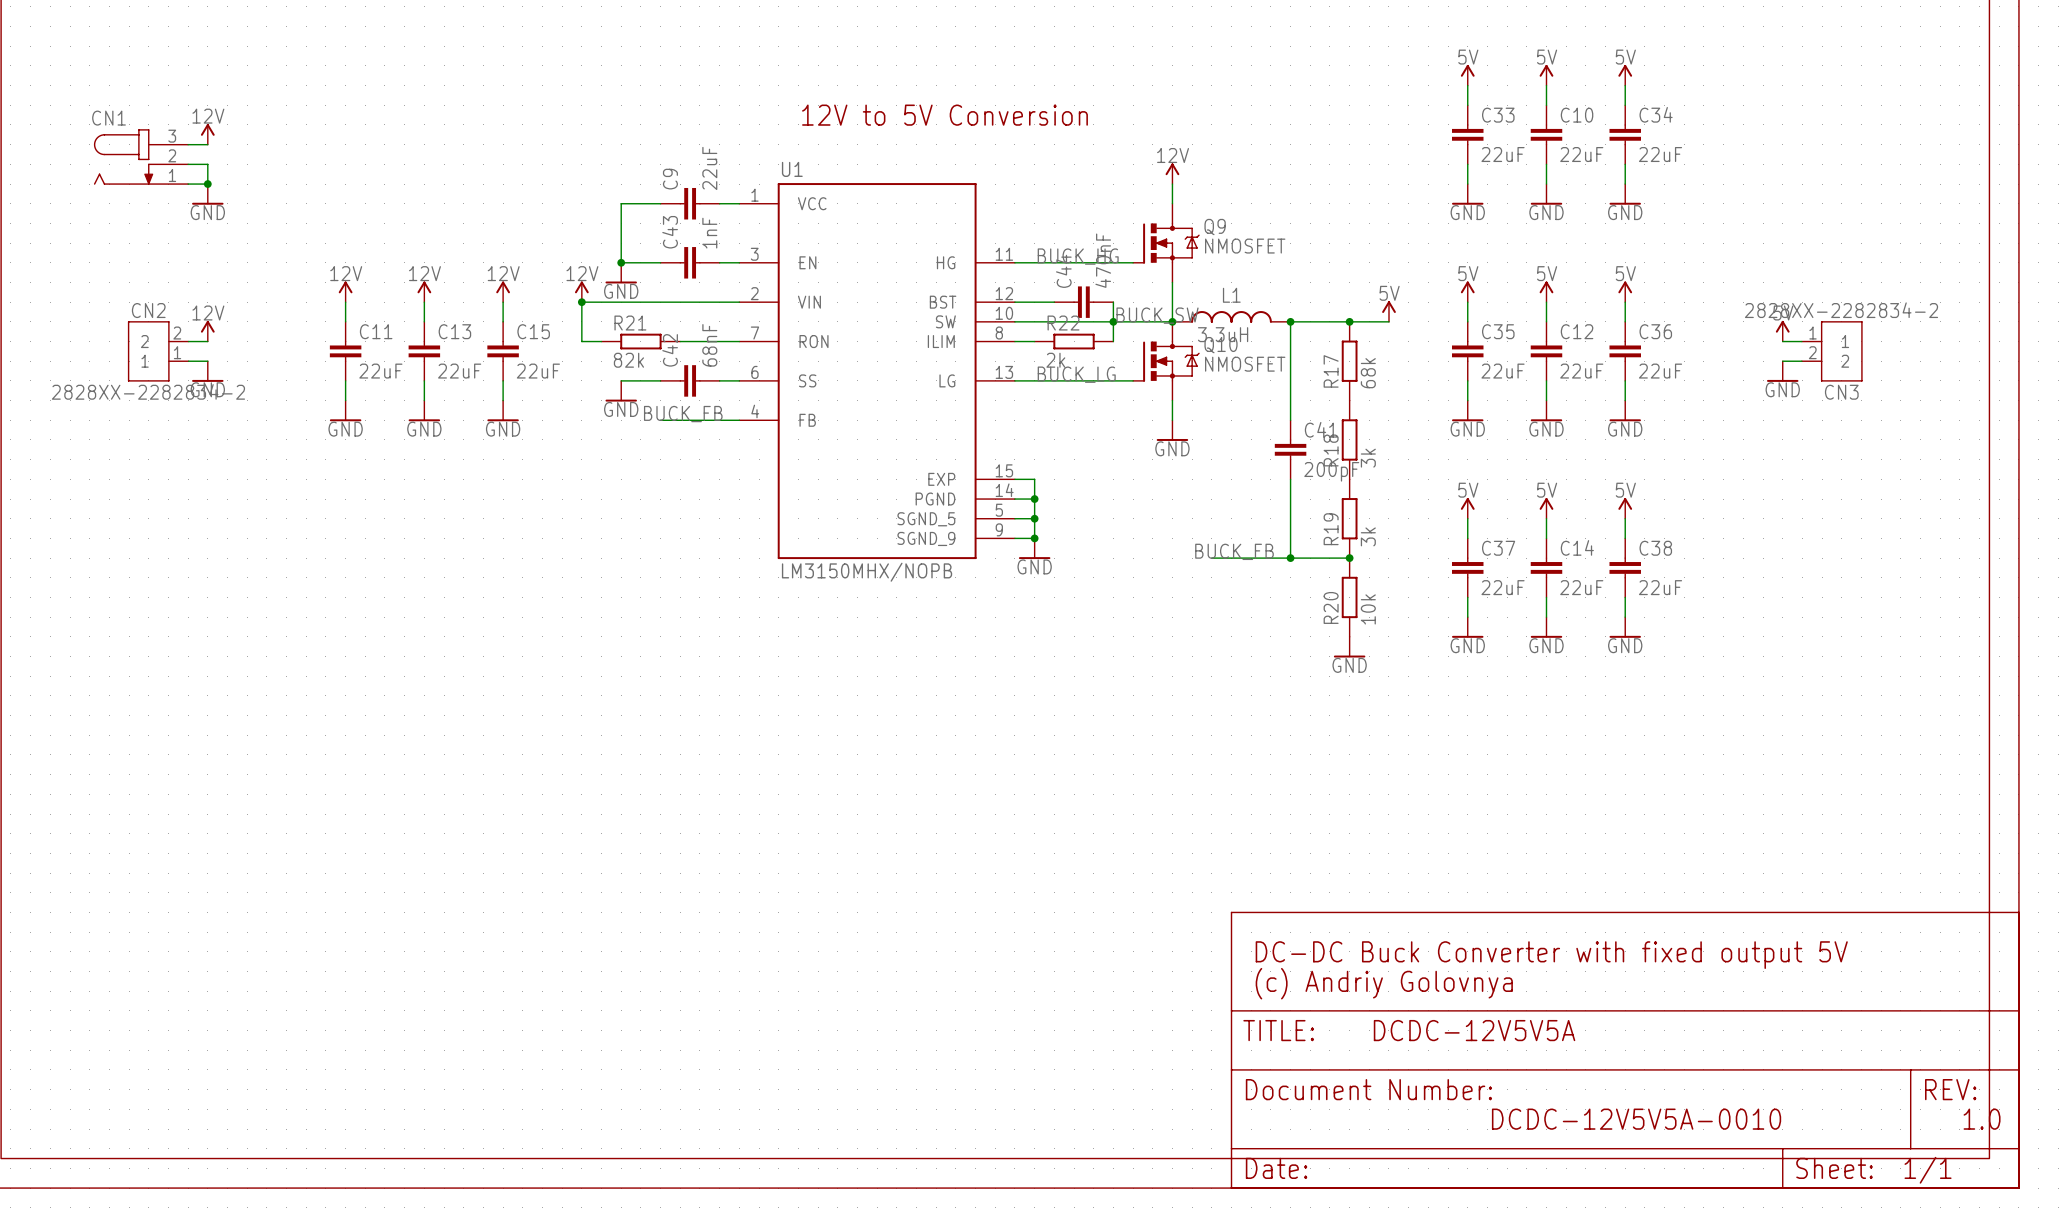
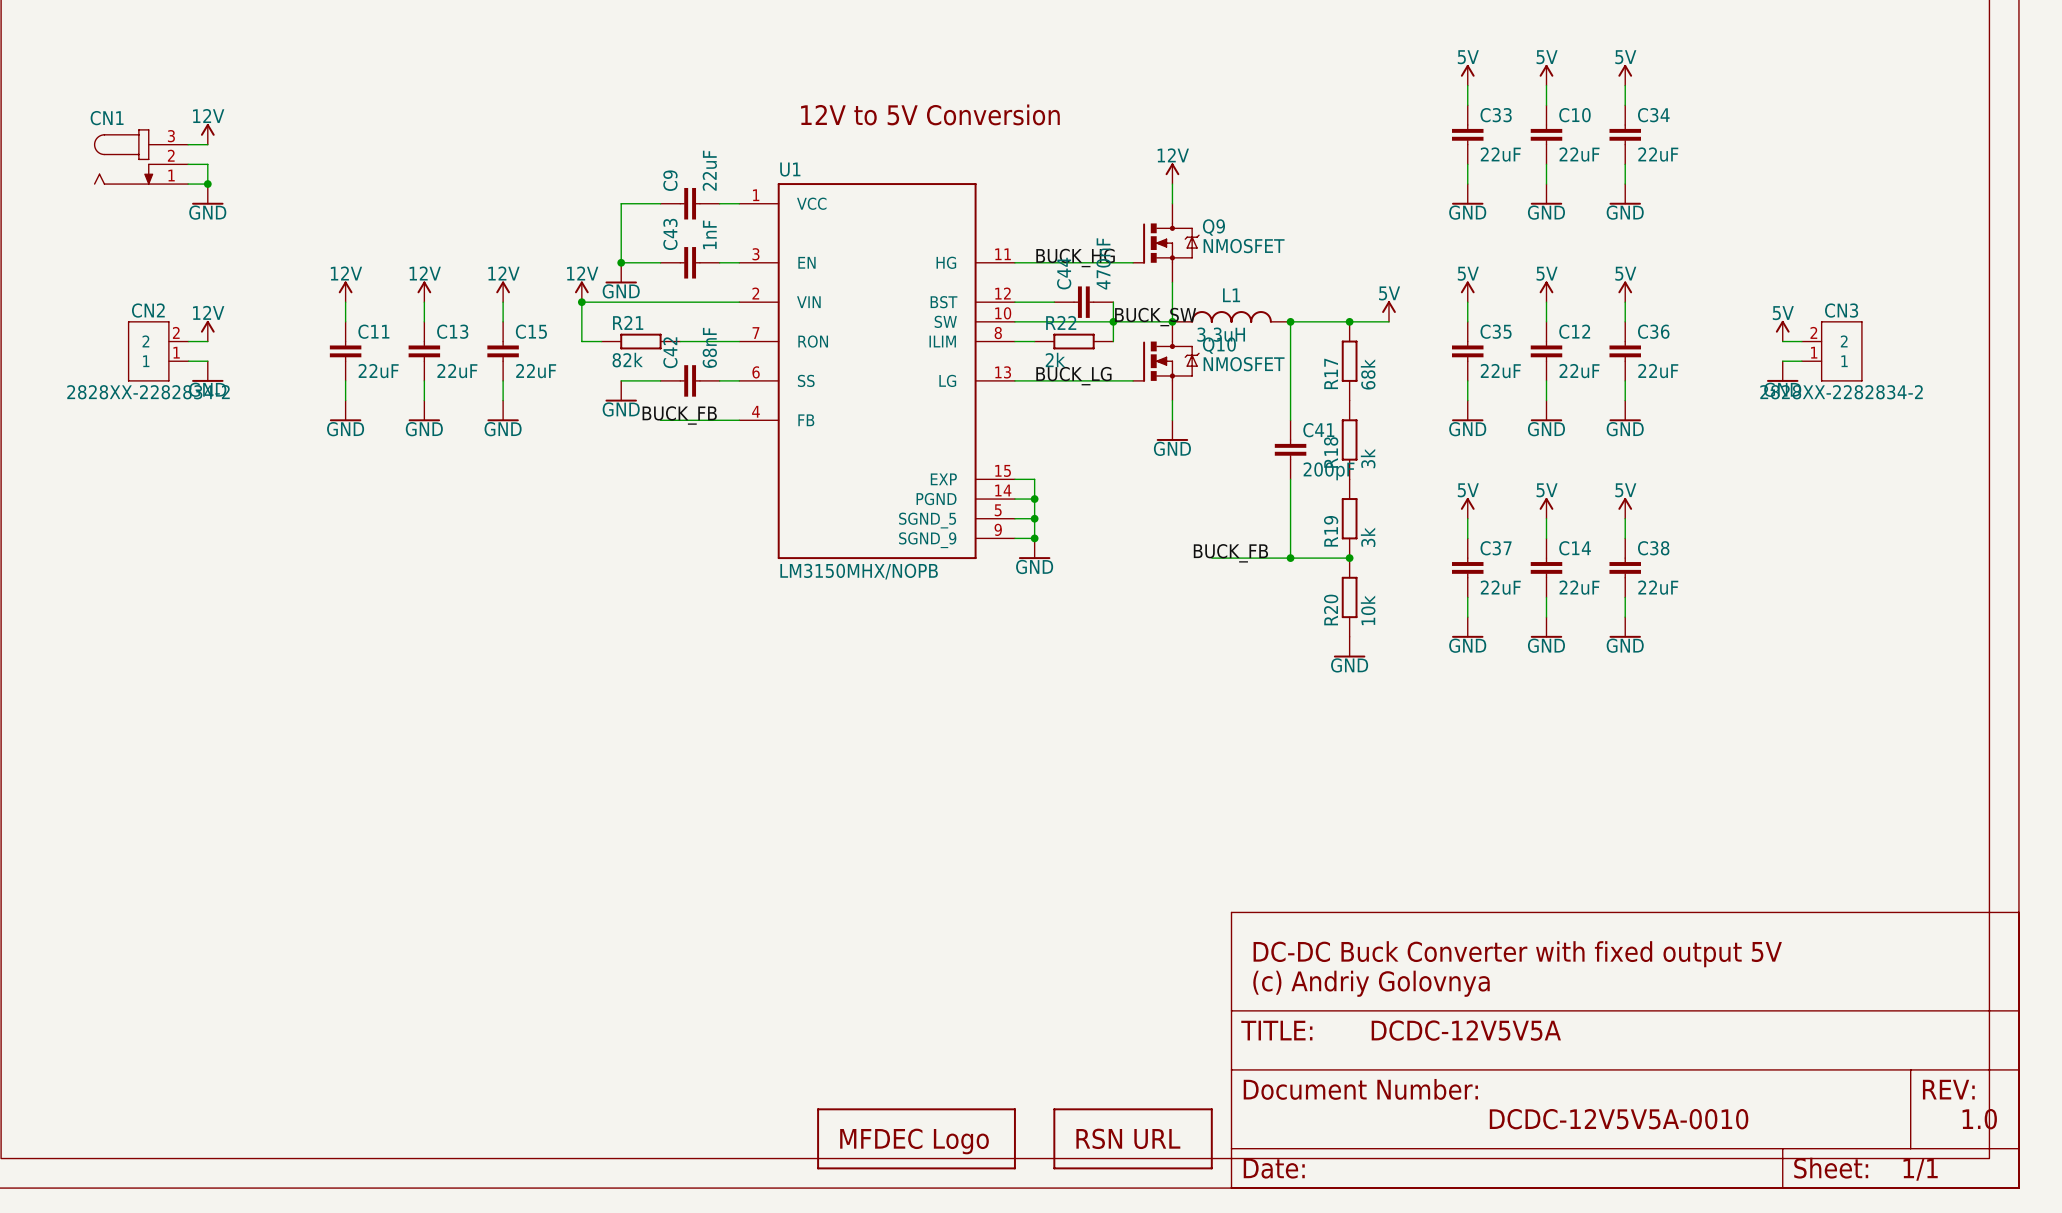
CN3 flip: as is (1841, 351) -> up-down (1841, 351)
part: none -> (916, 1138)
part: none -> (1133, 1138)

